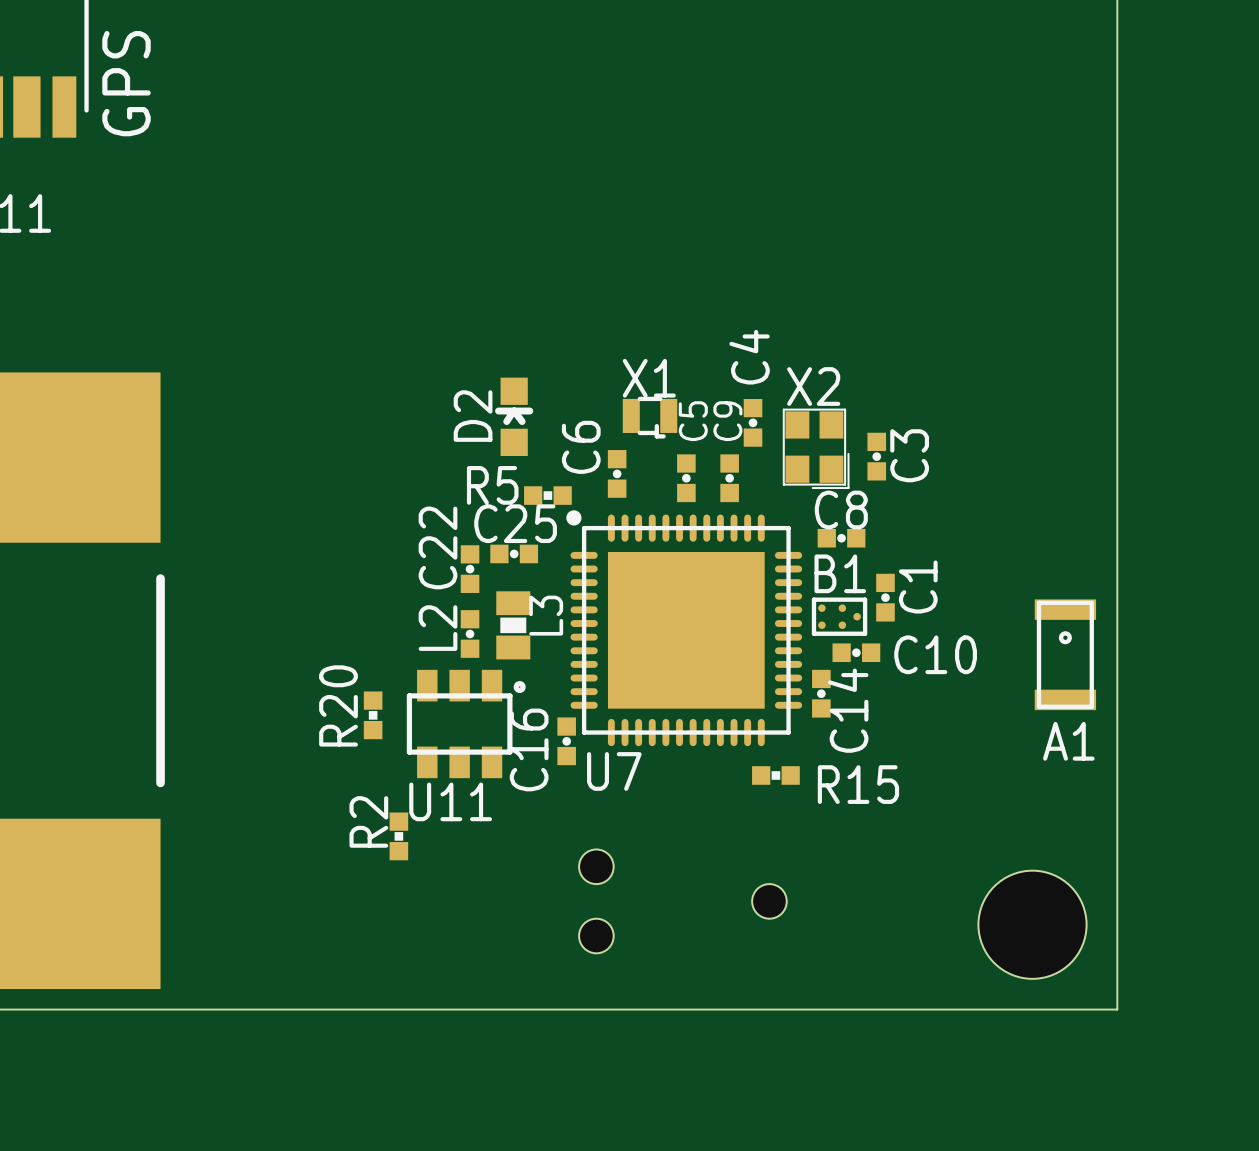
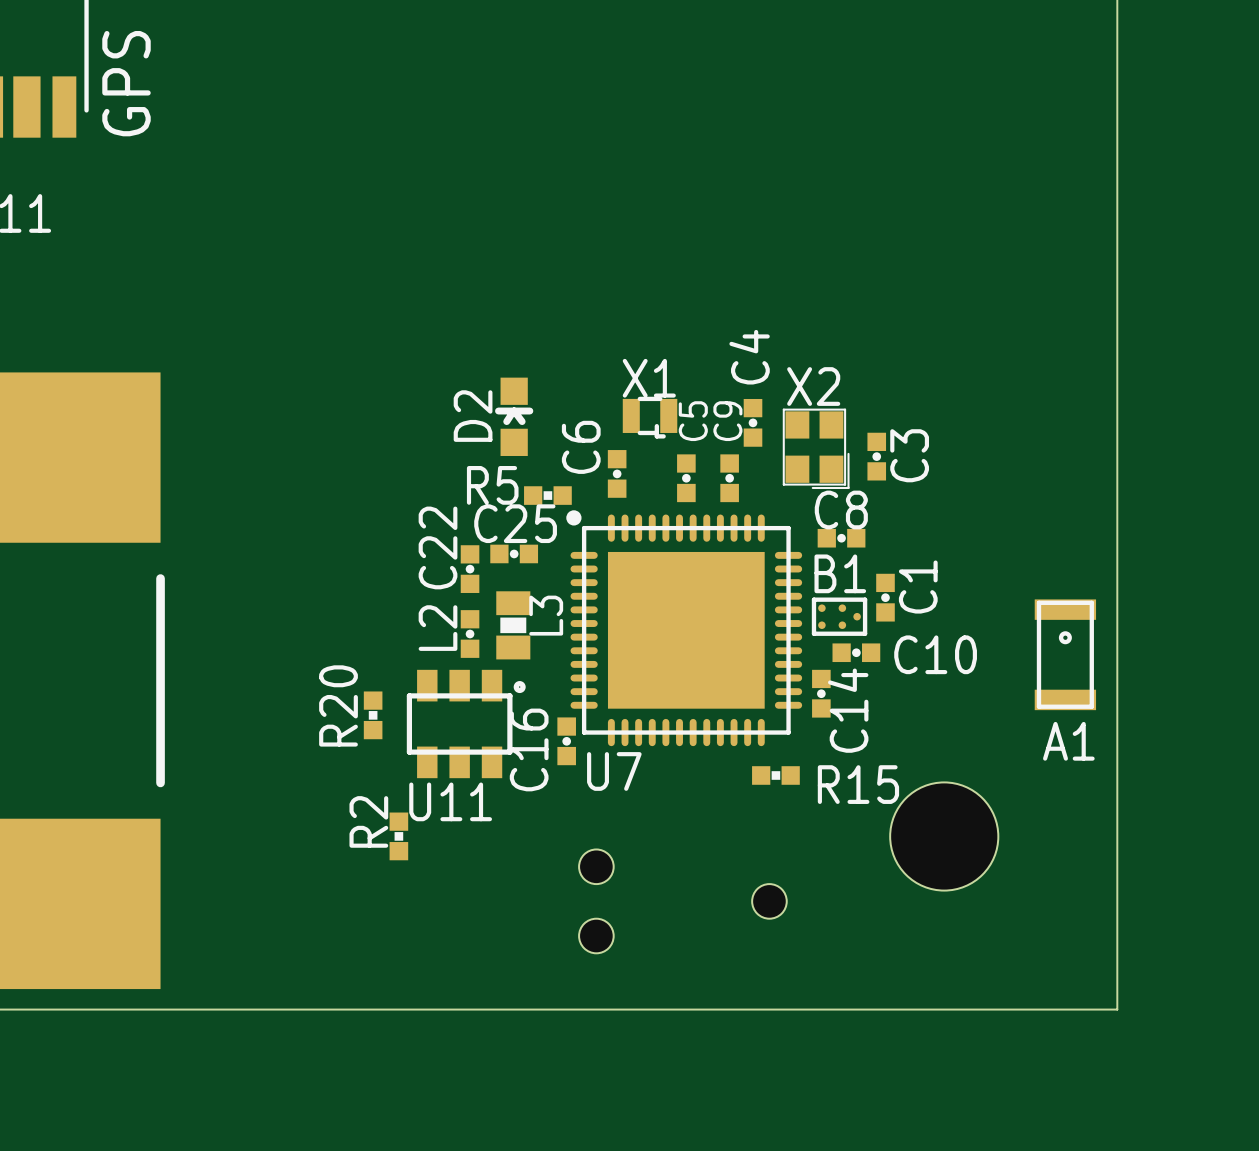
hole position: (1032, 924) -> (944, 836)

